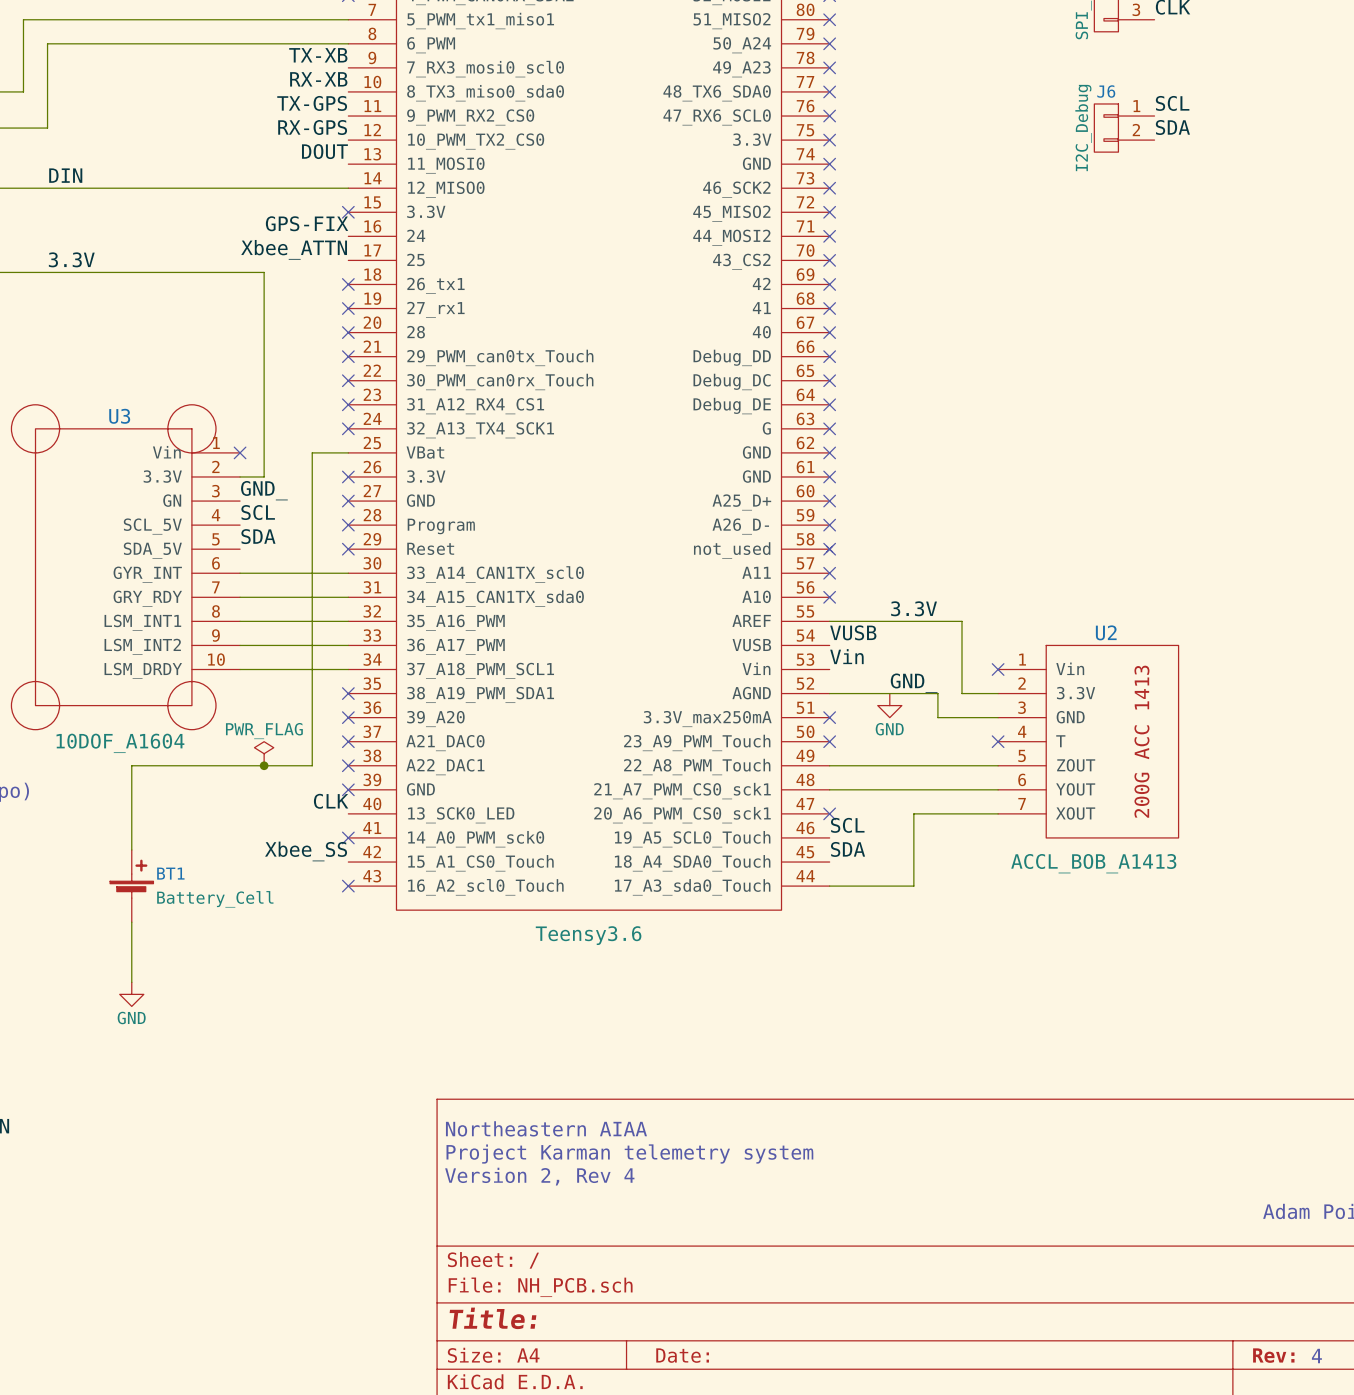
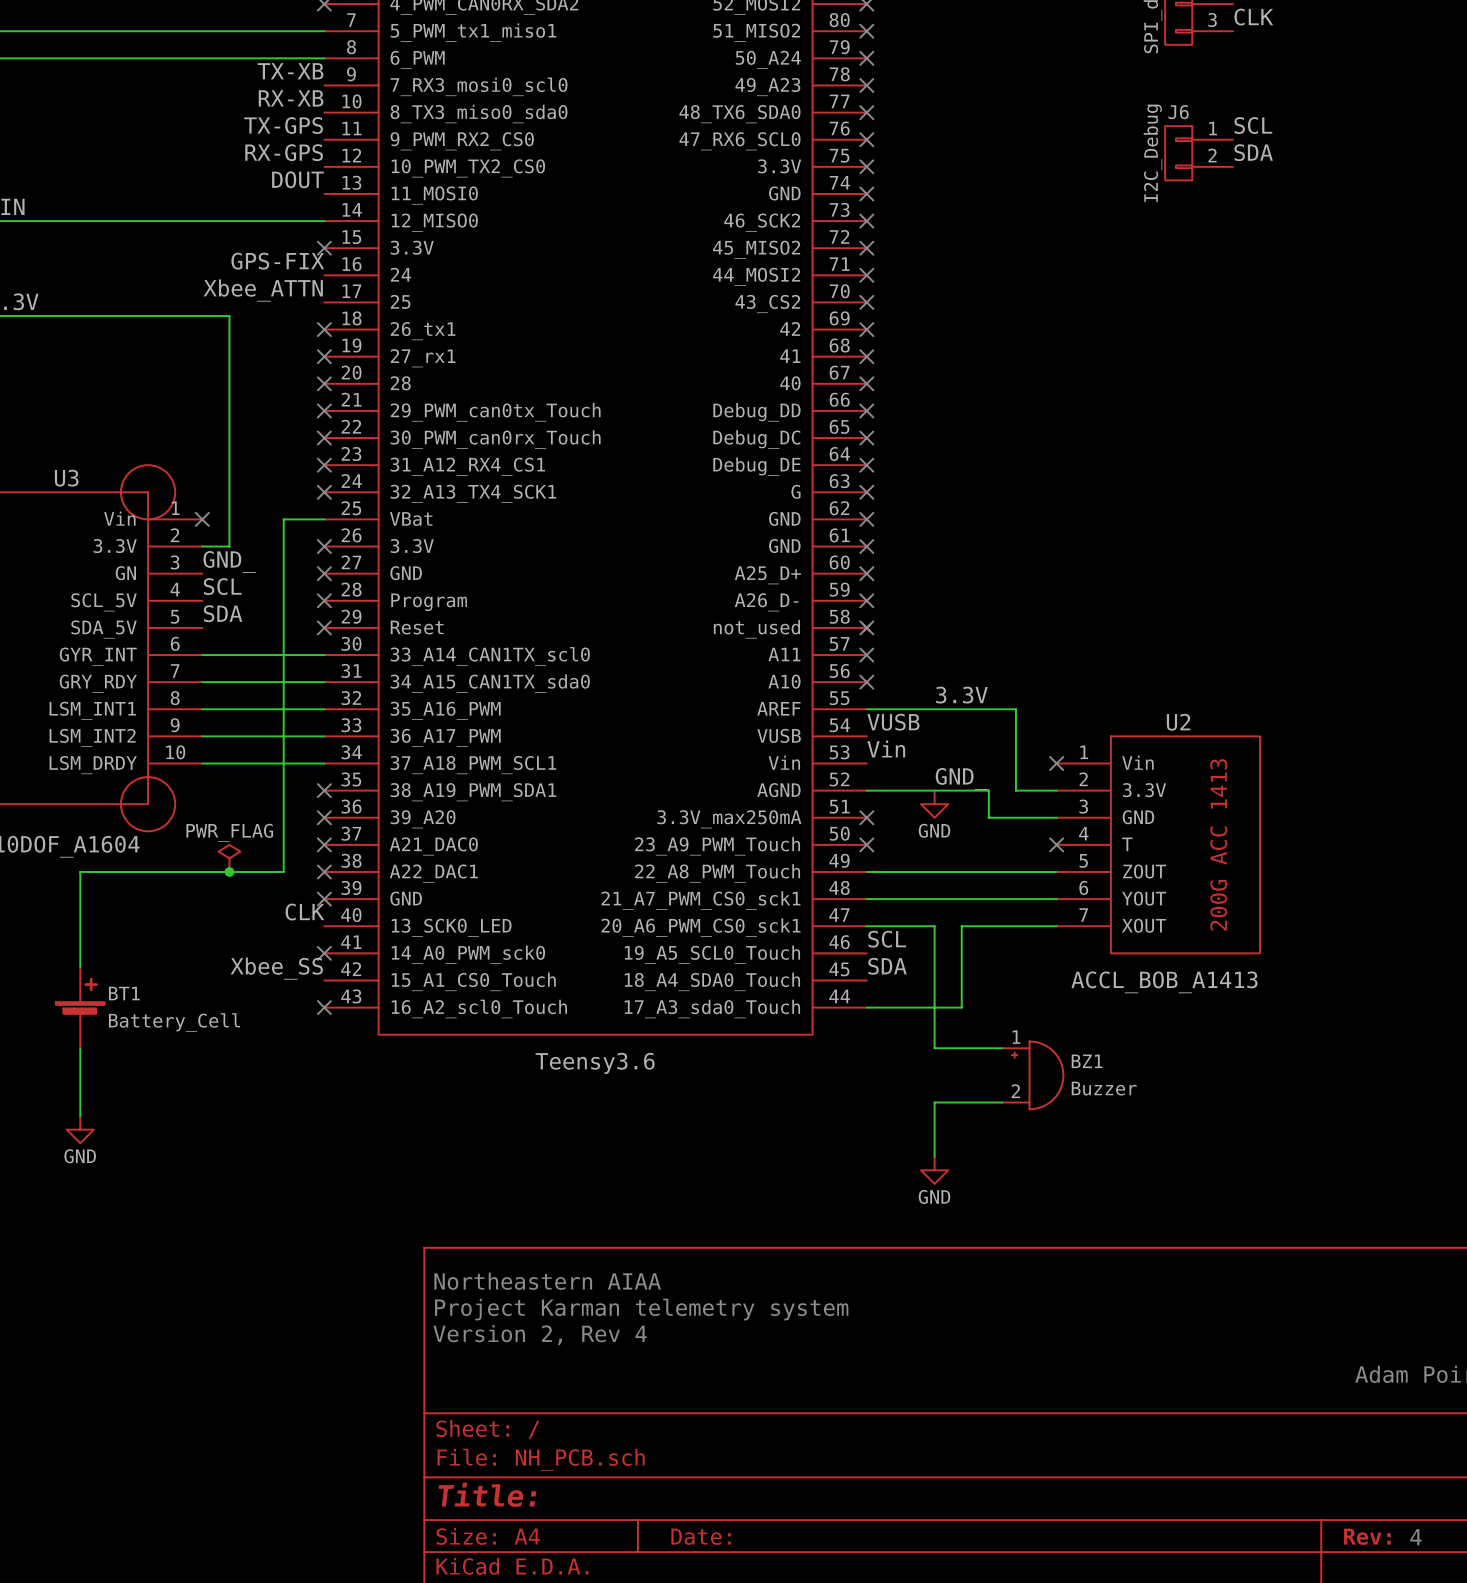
wire: none -> (866, 926) (934, 926) (934, 1048) (1002, 1048)
no-connect mark: (829, 813) -> none
BZ1: none -> Buzzer (1032, 1075)
wire: none -> (1002, 1102) (934, 1102) (934, 1156)
power symbol: none -> GND (934, 1170)

